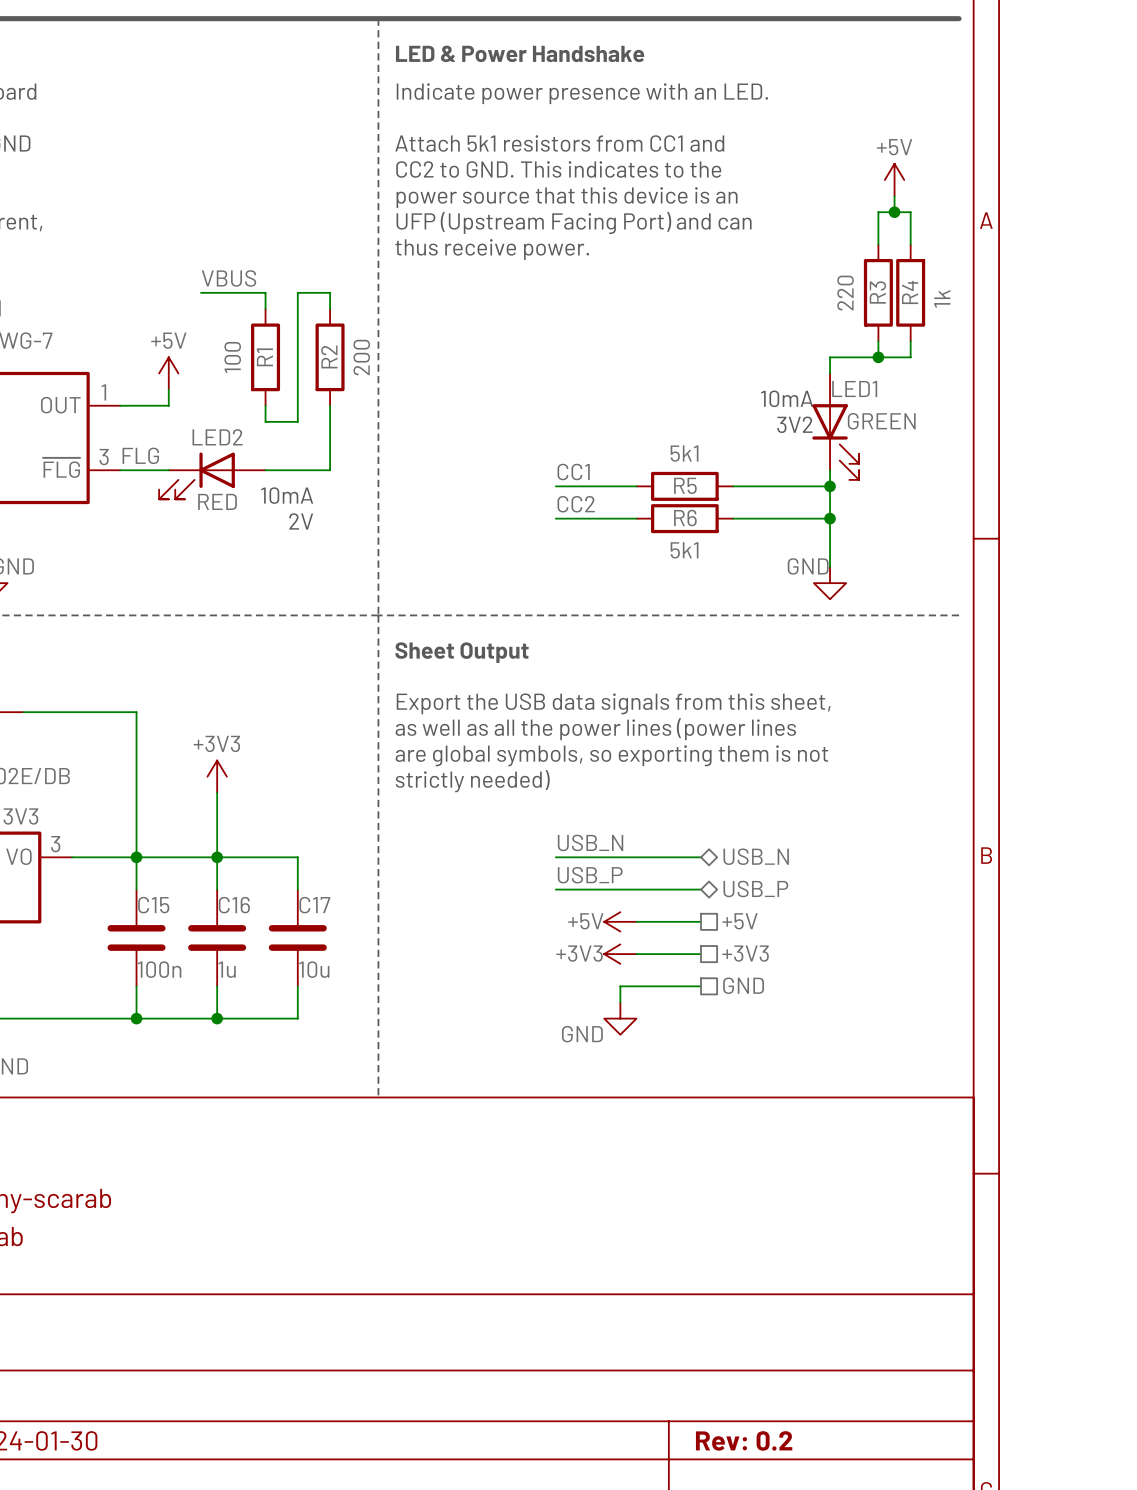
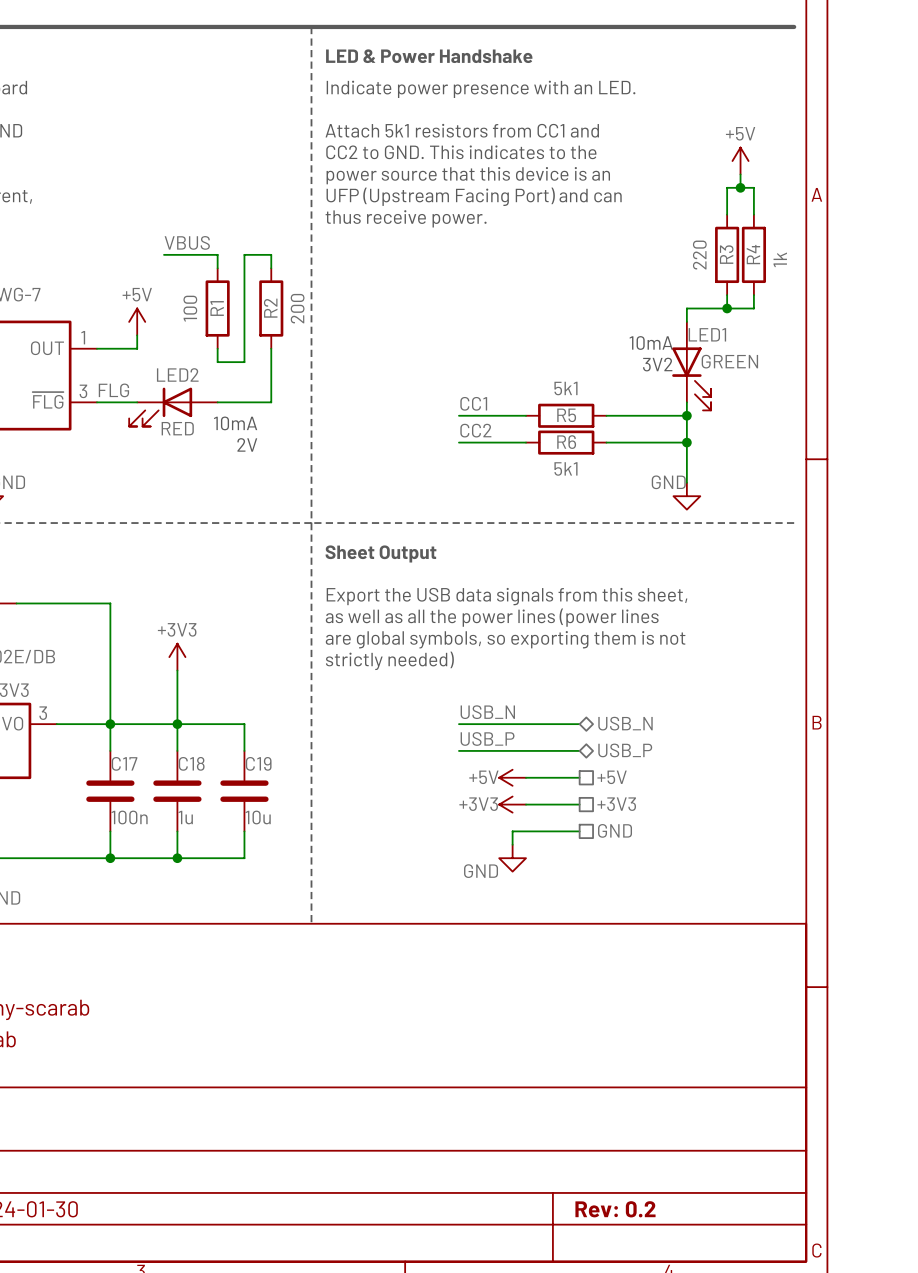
C15 name: C15 (153, 905) -> C17 (124, 763)
C16 name: C16 (234, 905) -> C18 (191, 763)
C17 name: C17 (314, 905) -> C19 (258, 763)

